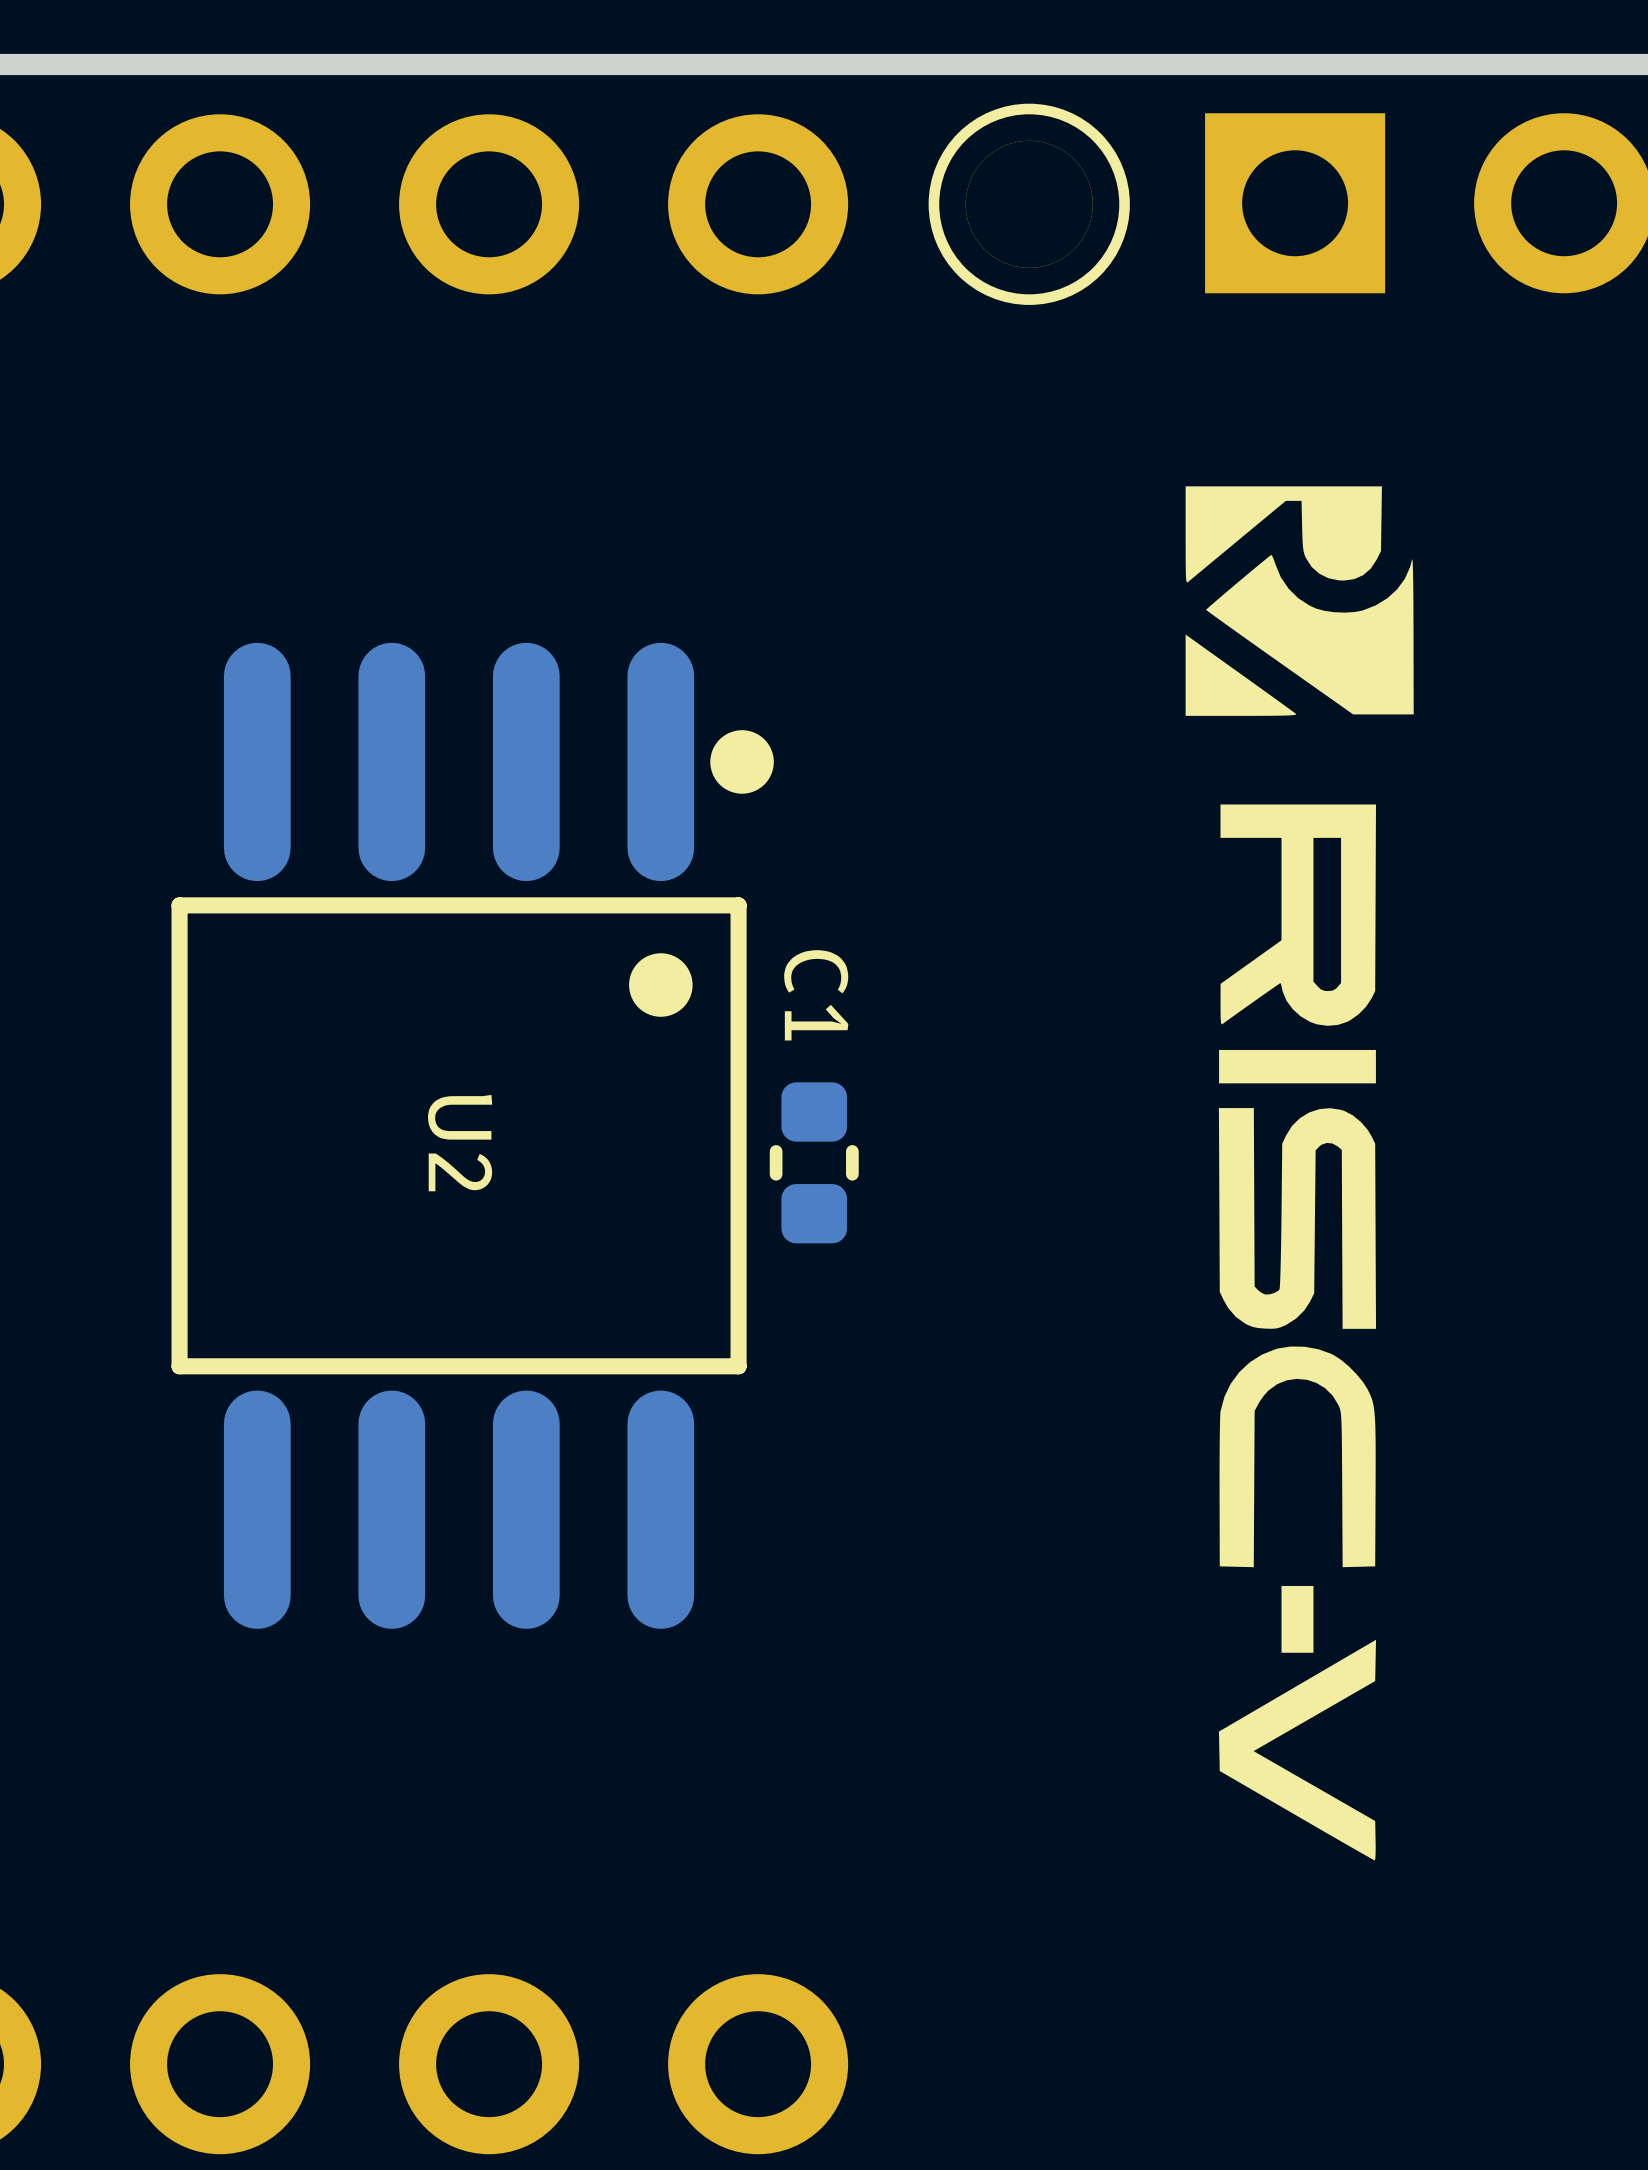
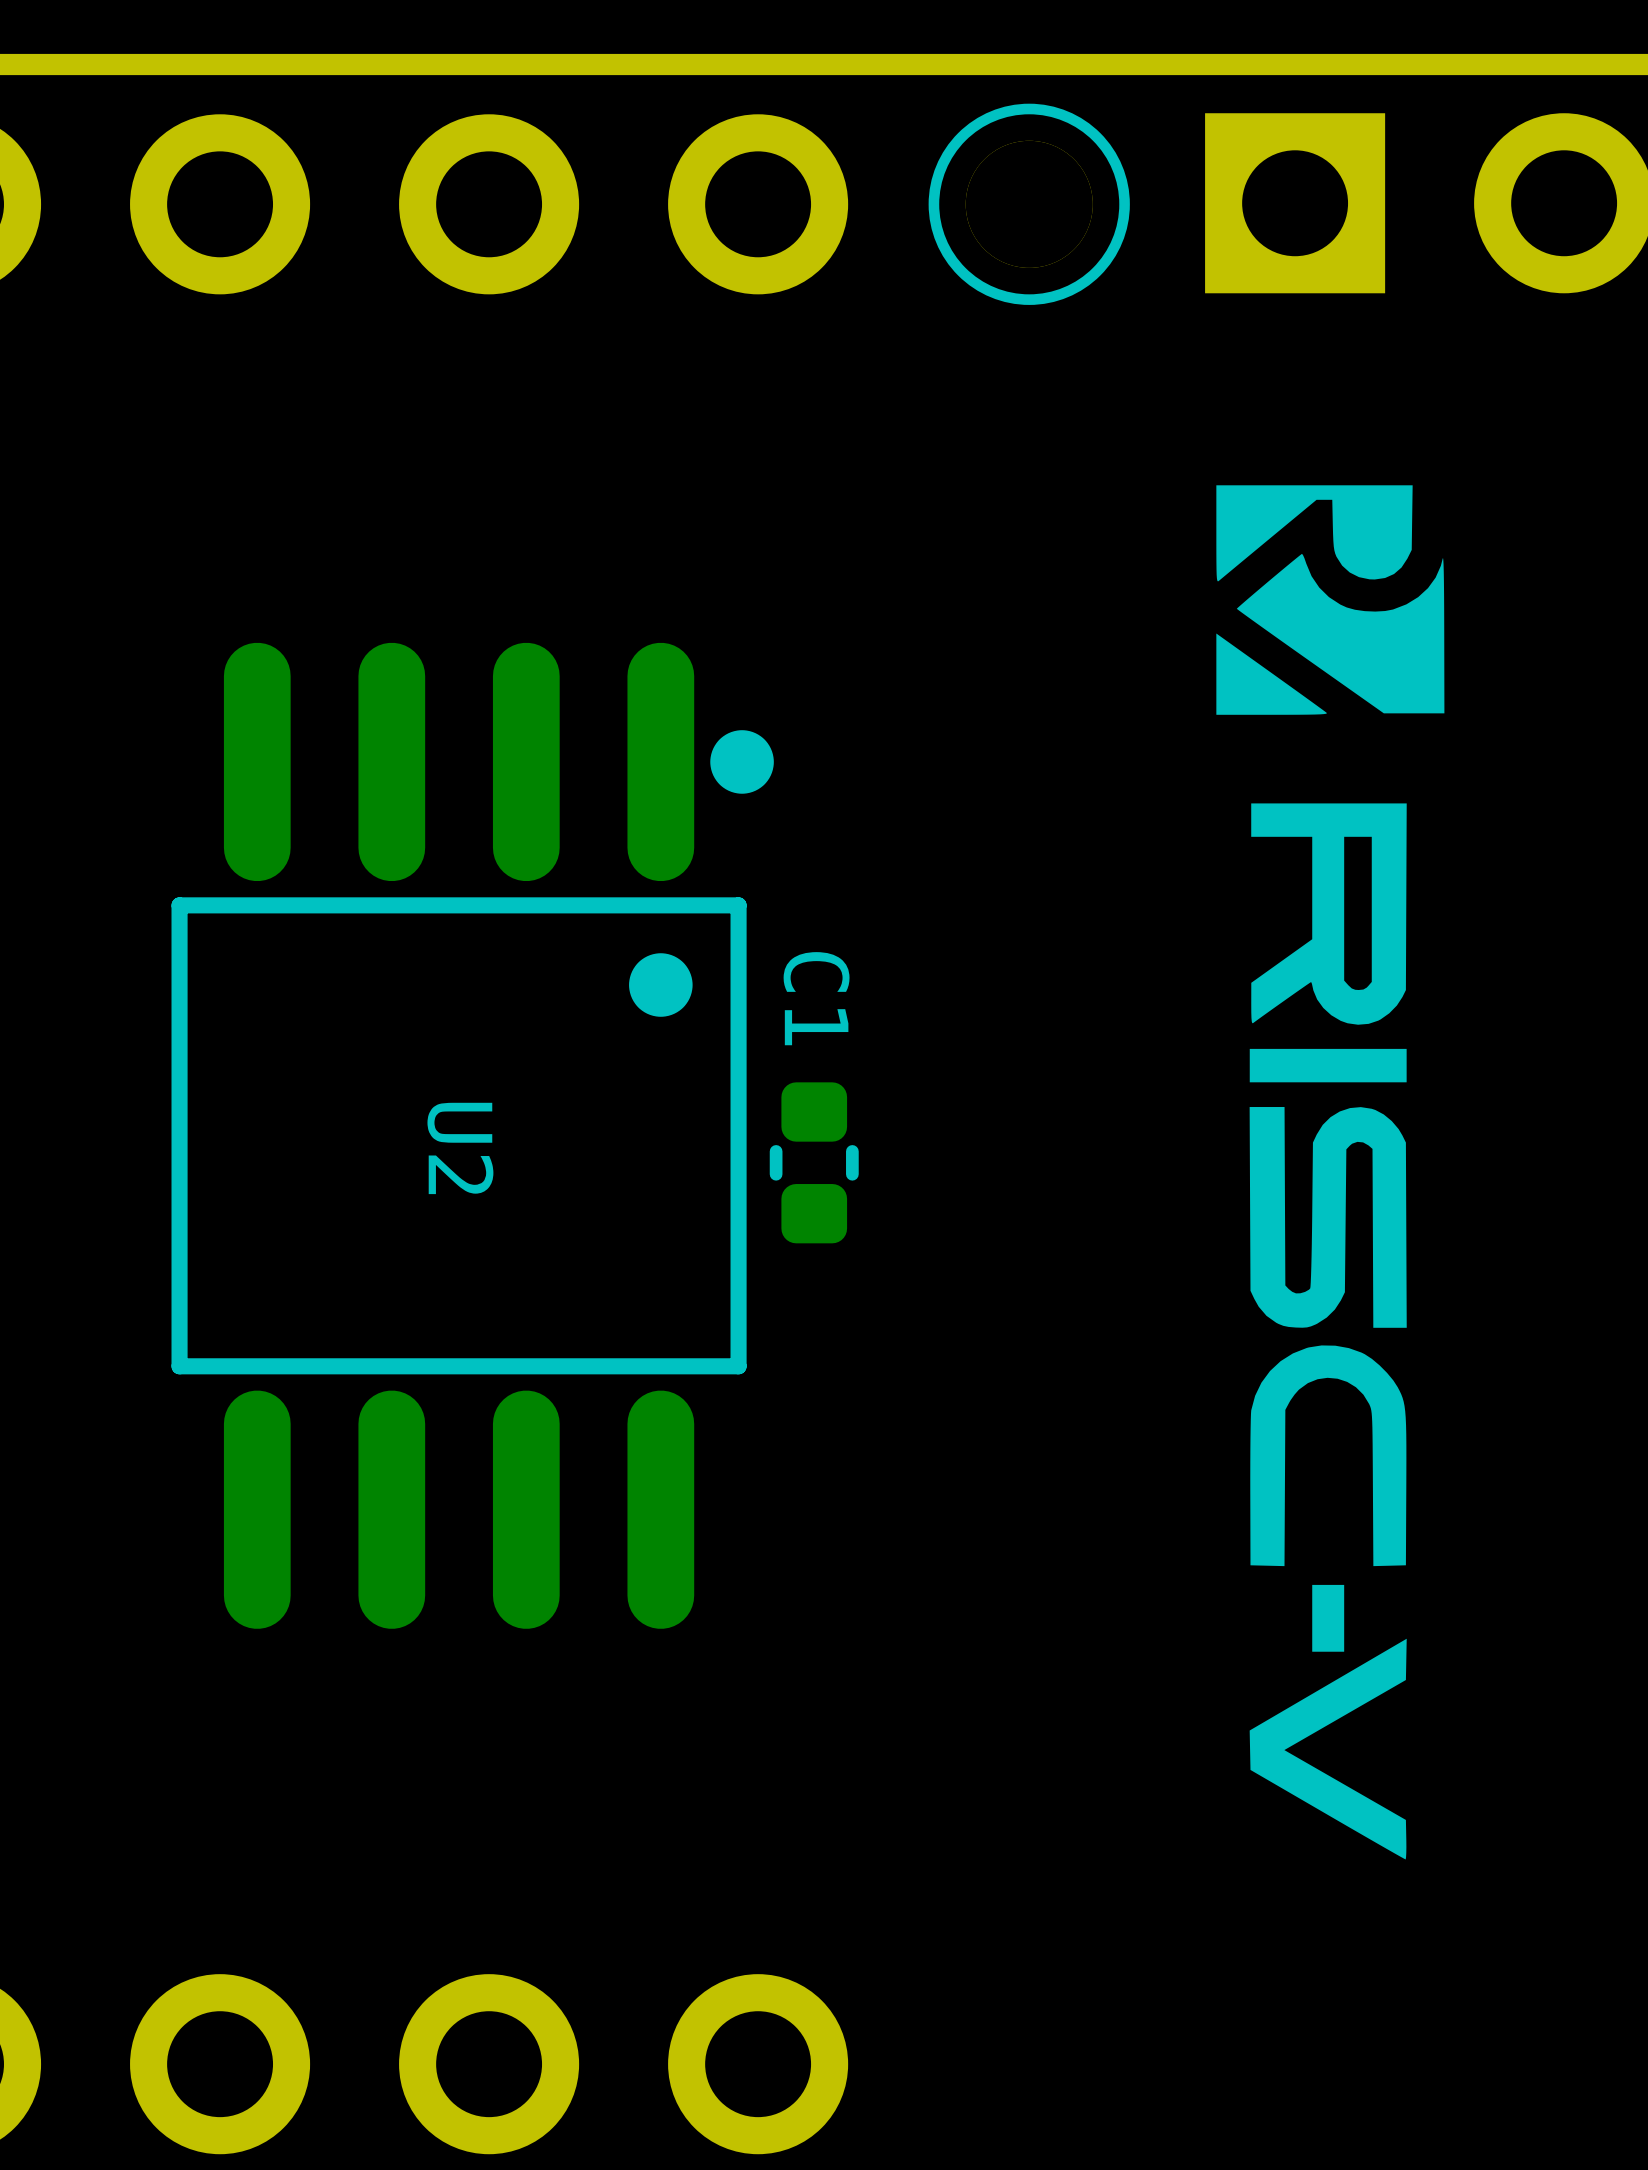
drawing position: (1299, 1173) -> (1330, 1172)

